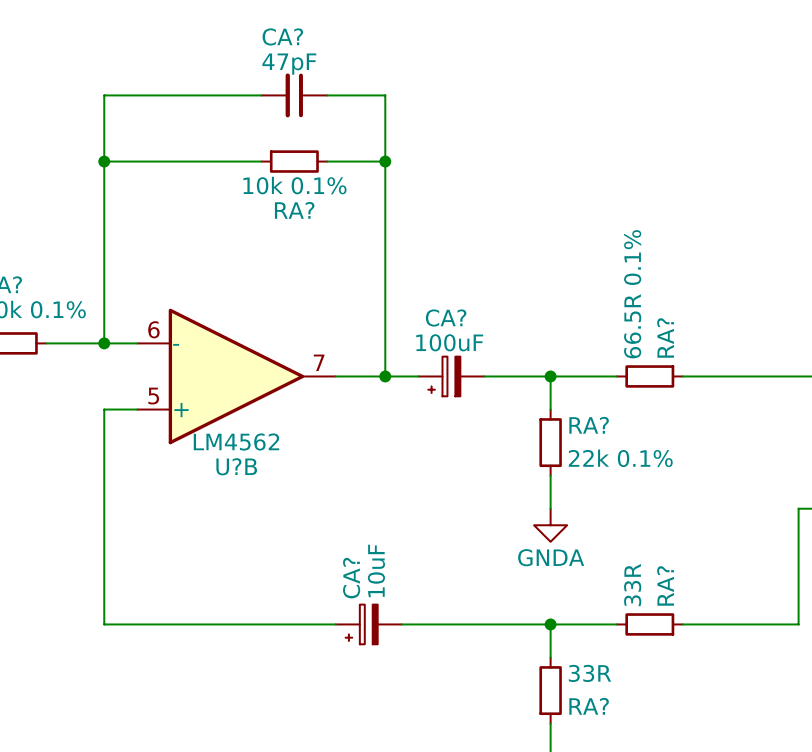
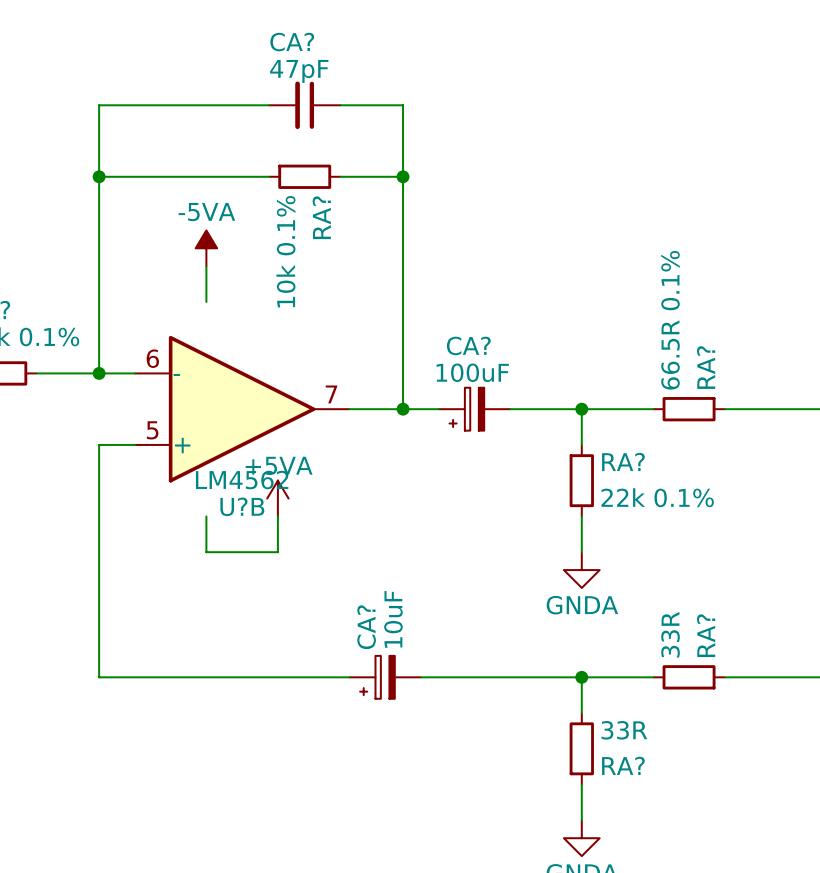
RA? value rotation: 0° (294, 185) -> 90° counterclockwise (285, 251)
RA? name rotation: 0° (294, 210) -> 90° counterclockwise (321, 217)
power symbol: none -> -5VA (206, 248)
wire: none -> (206, 266) (206, 301)
power symbol: none -> +5VA (277, 498)
wire: none -> (206, 516) (206, 552) (277, 552) (277, 516)

